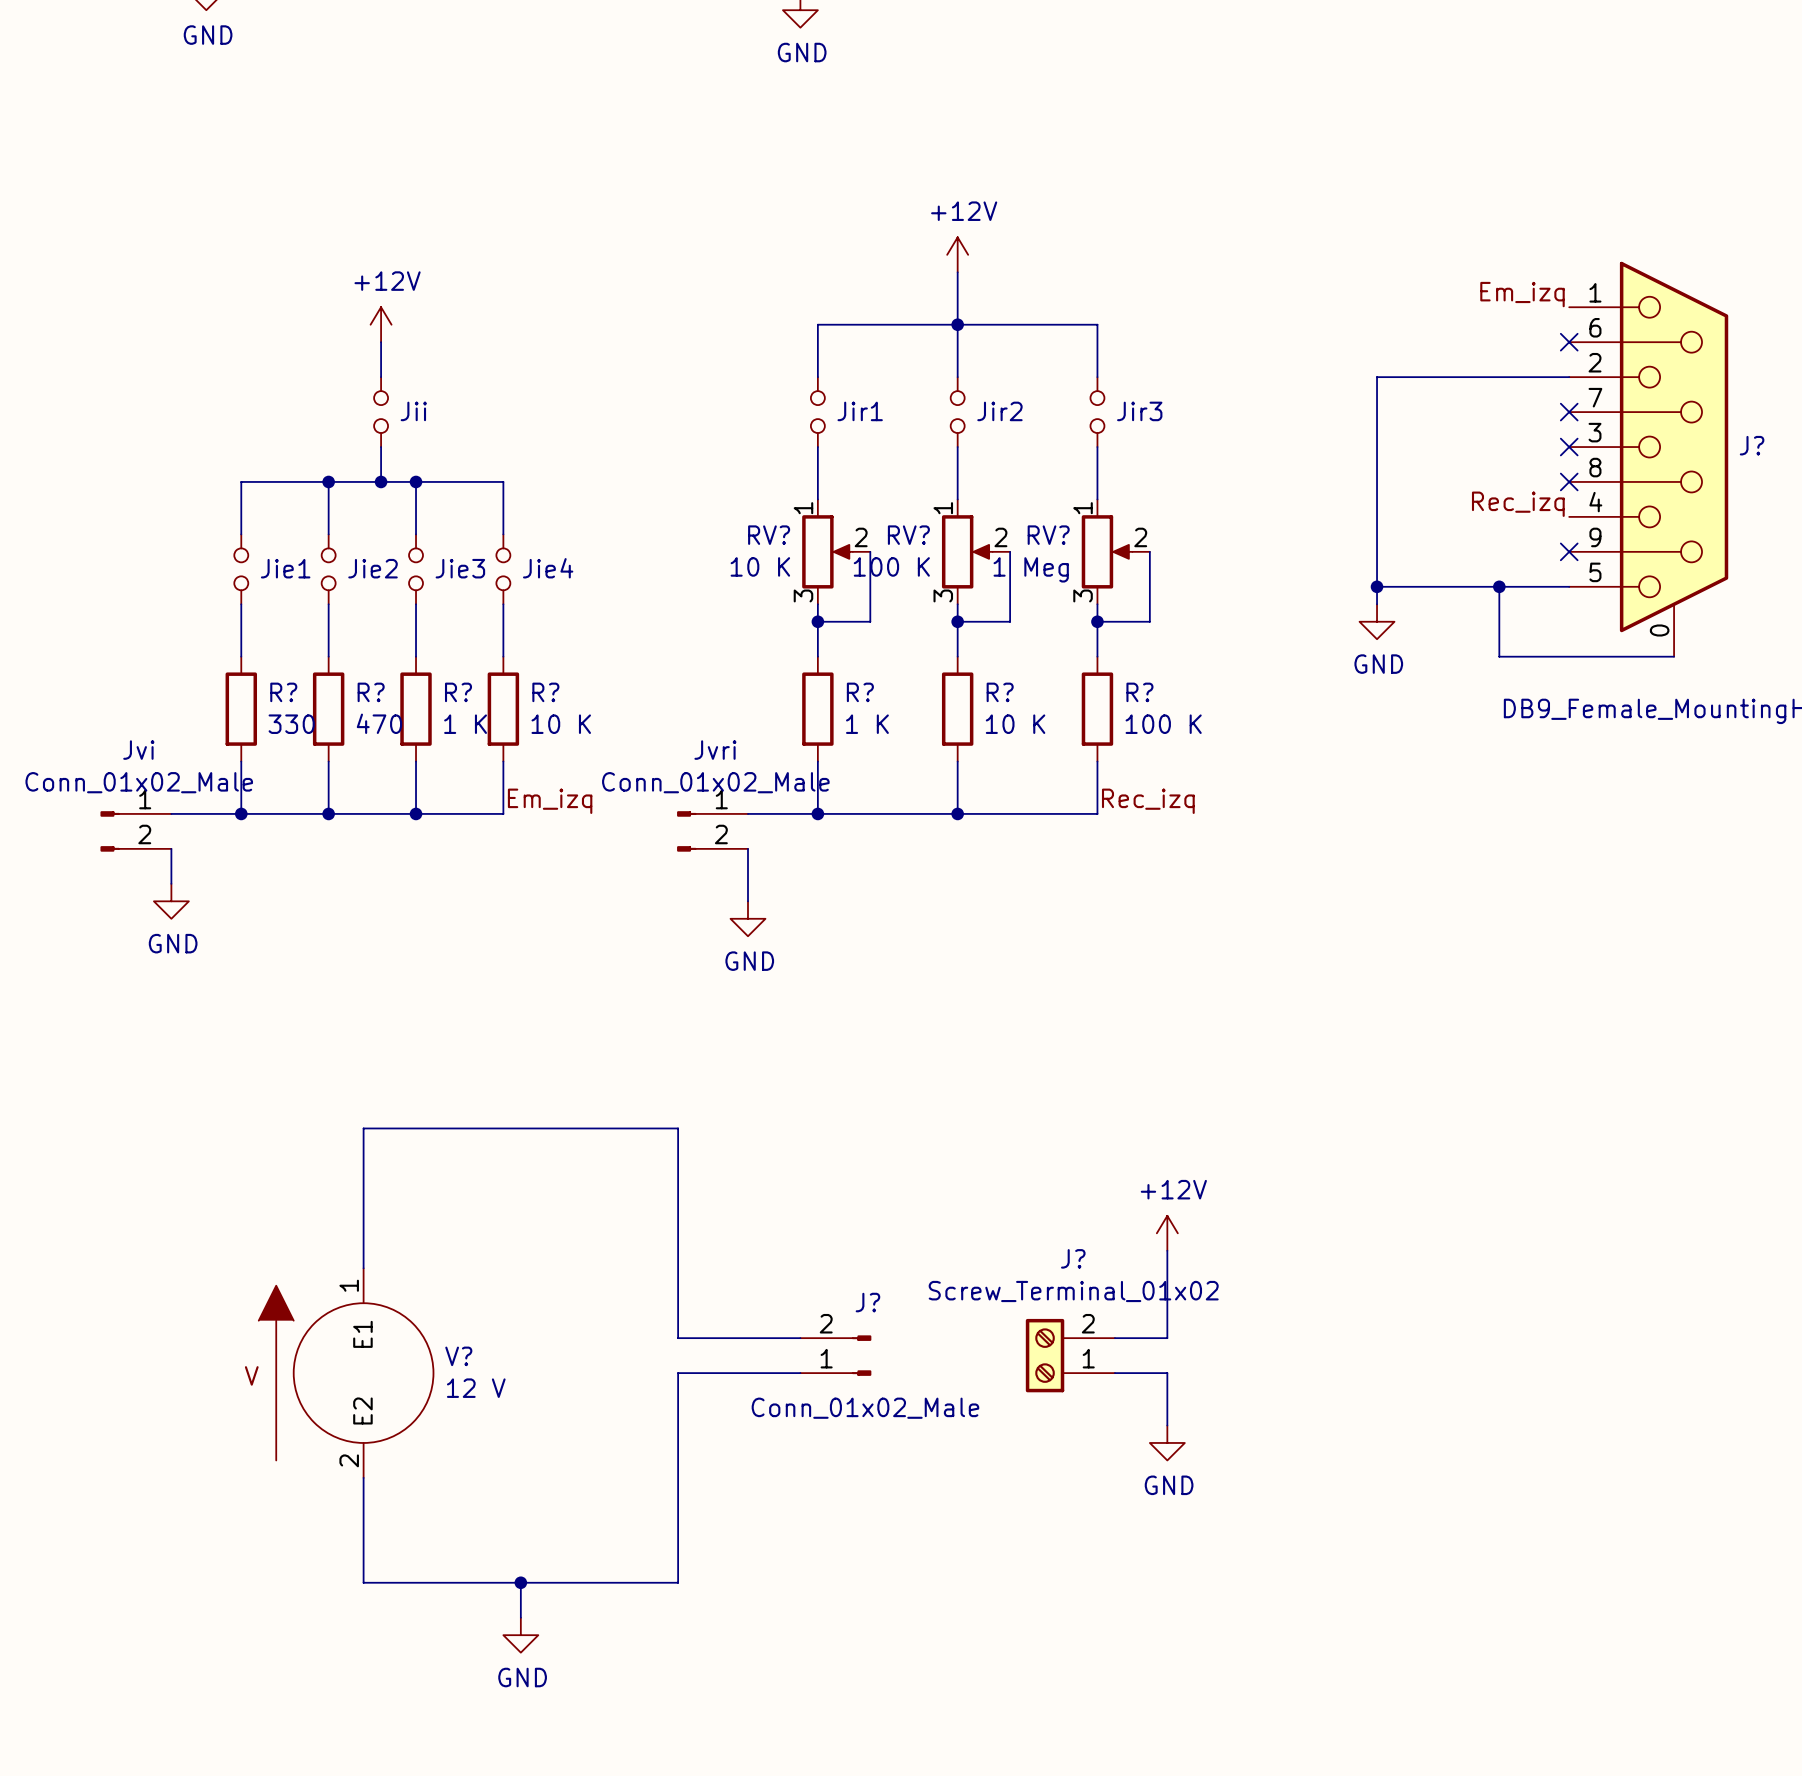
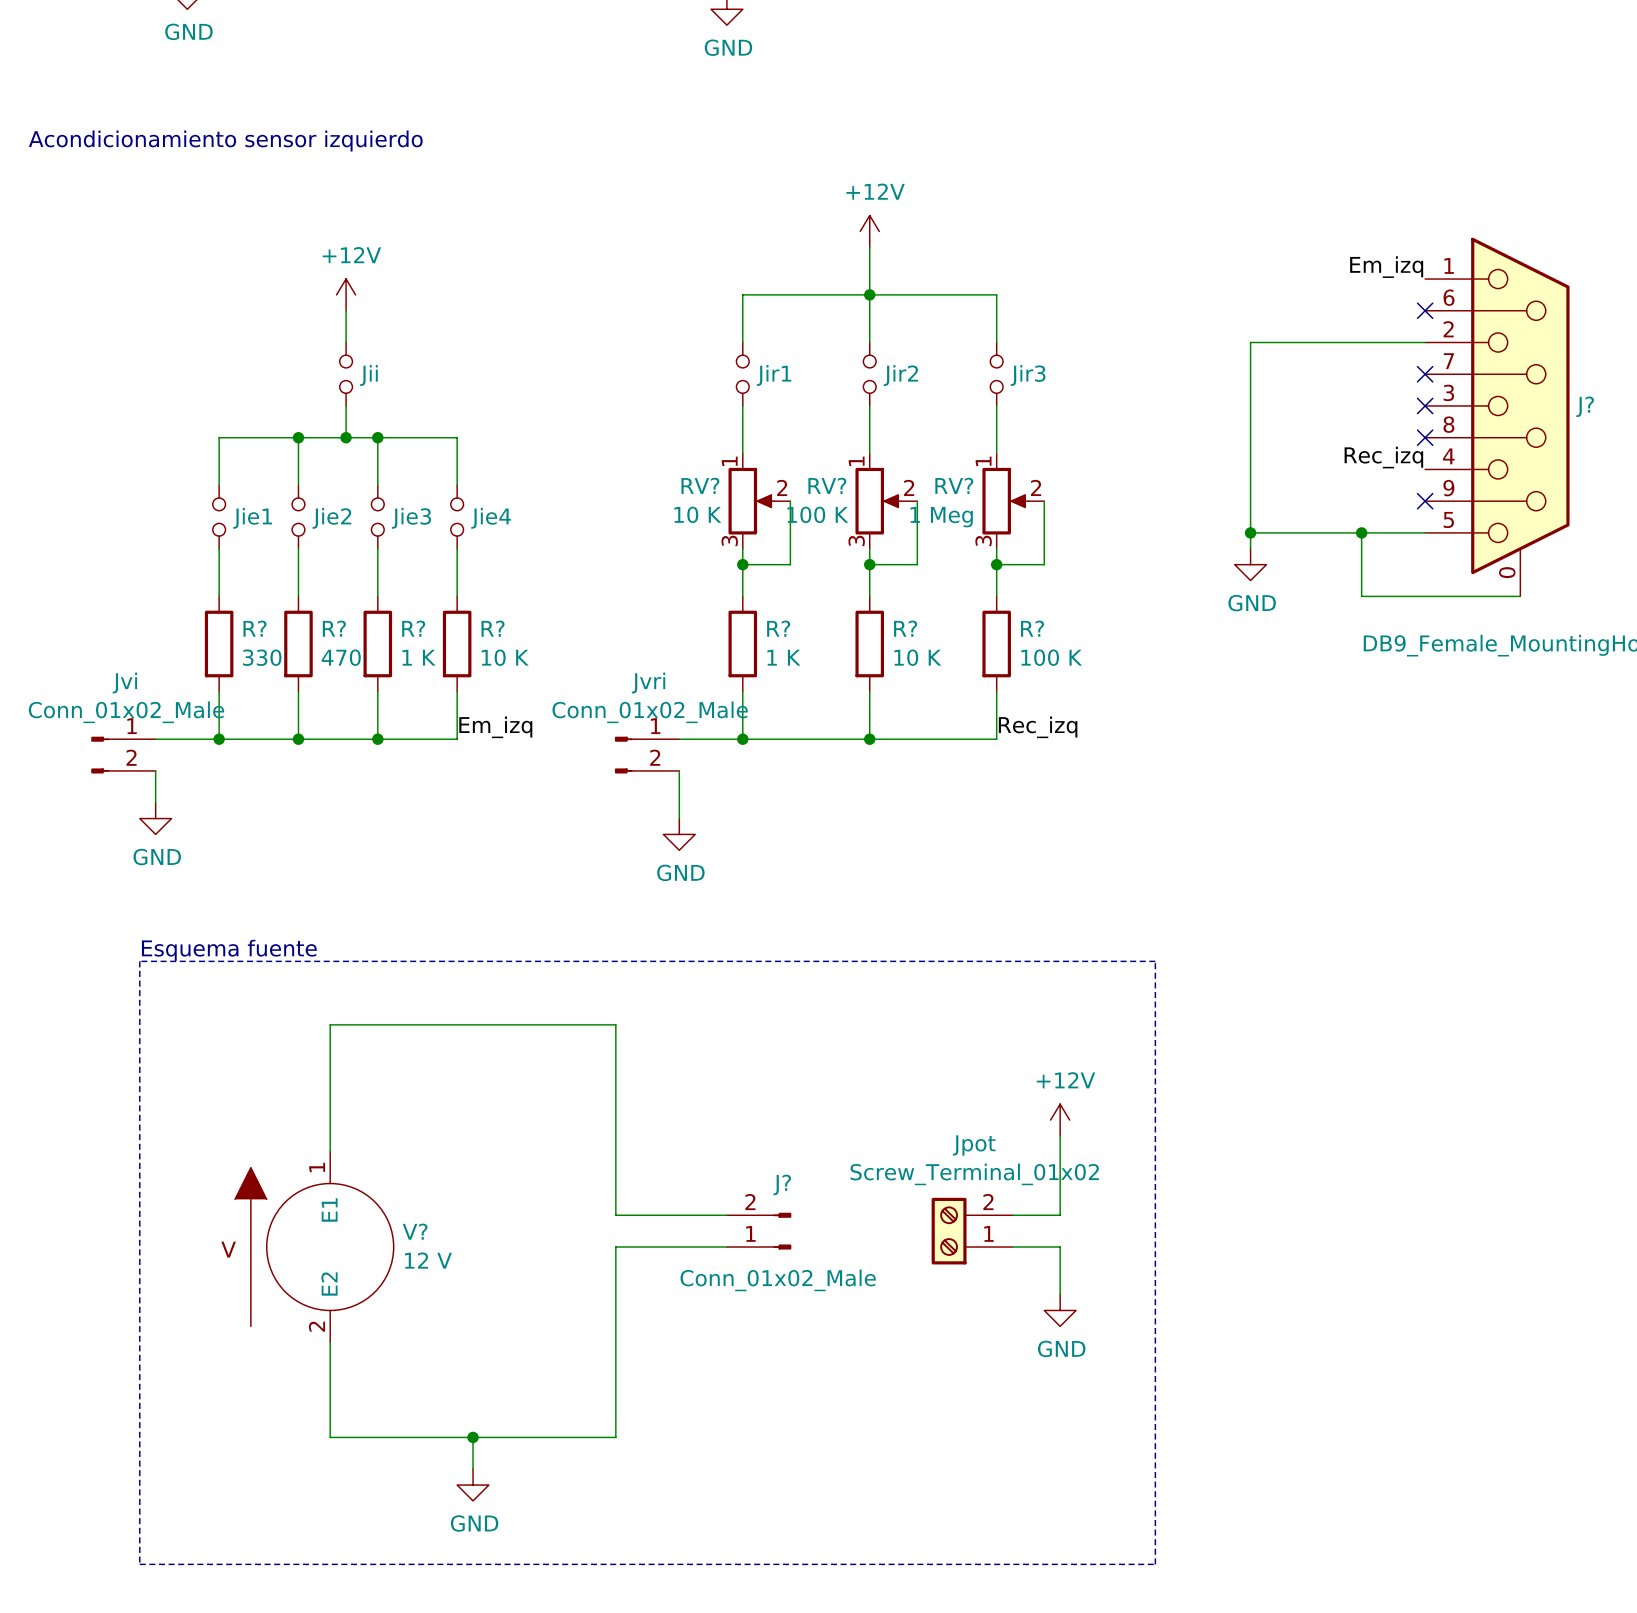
text: none -> Acondicionamiento sensor izquierdo (225, 141)
text: none -> Esquema fuente (229, 950)
line: none -> (139, 961) (139, 1564) (1155, 1564) (1155, 961) (139, 961)
J? name: J? (1073, 1258) -> Jpot (974, 1145)

